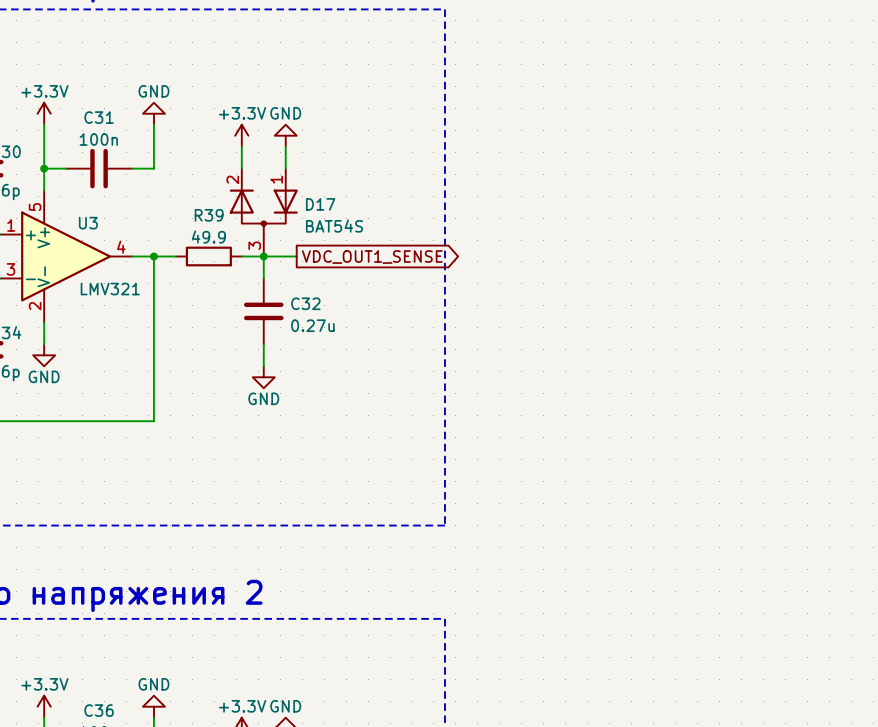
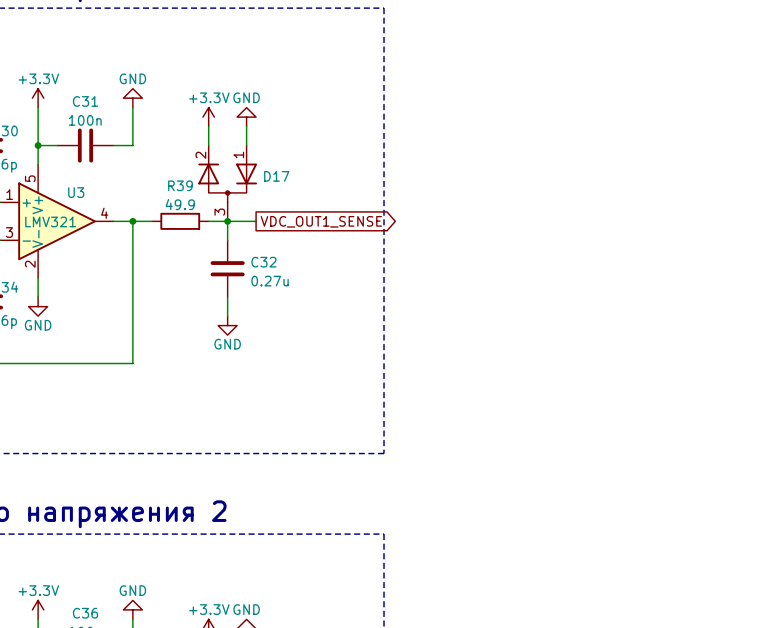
D17 value: BAT54S (334, 226) -> none
U3 text: none -> LMV321 (50, 221)
U3 value: LMV321 (110, 289) -> none

